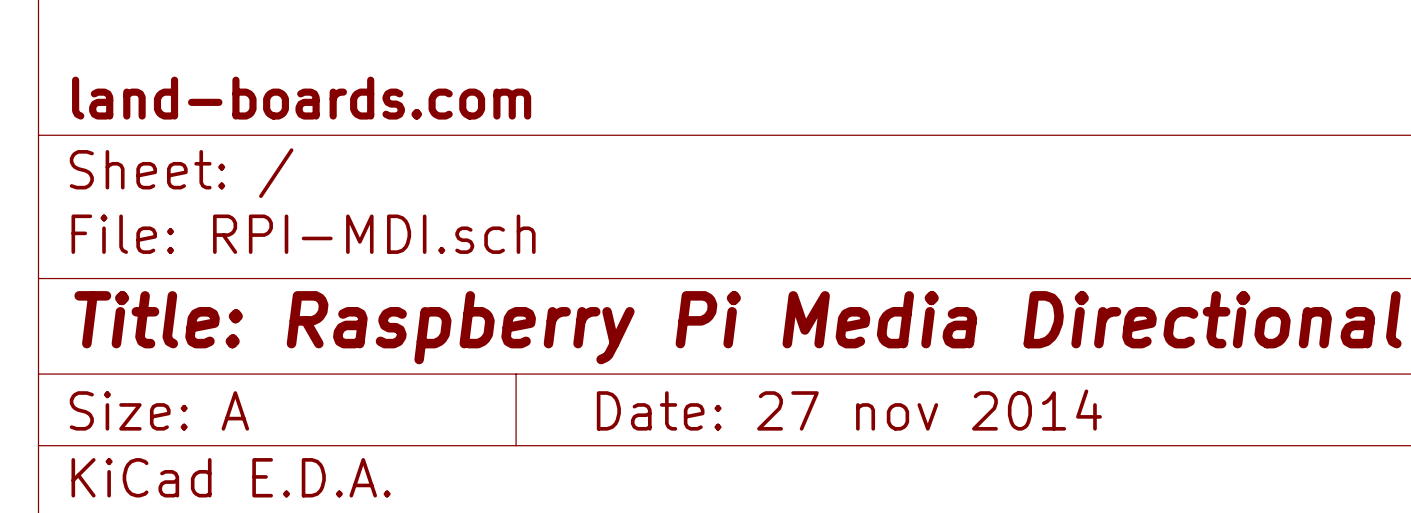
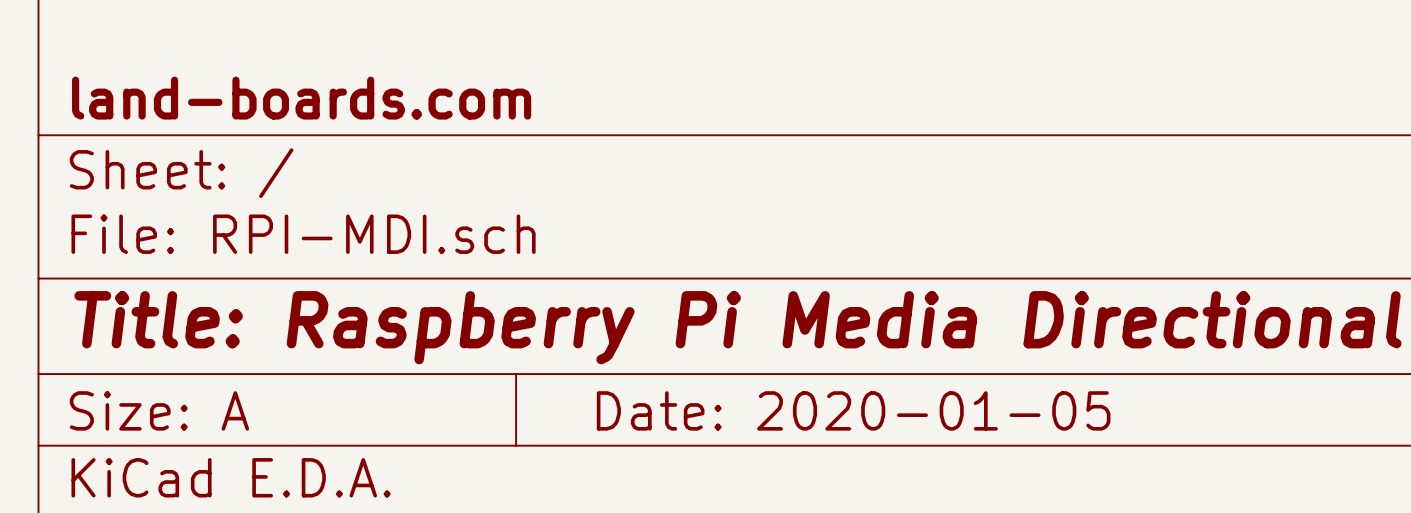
title block: Date: 27 nov 2014 (849, 410) -> Date: 2020-01-05 (853, 410)

